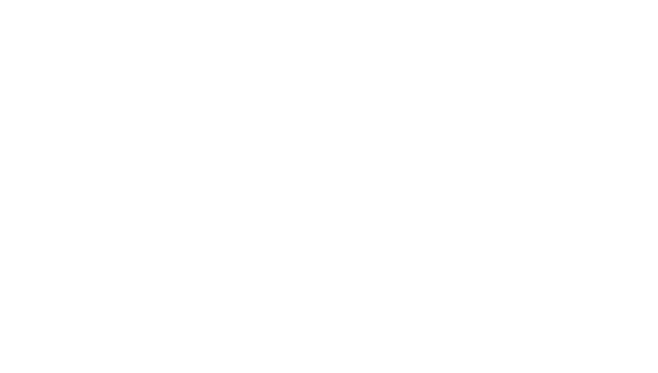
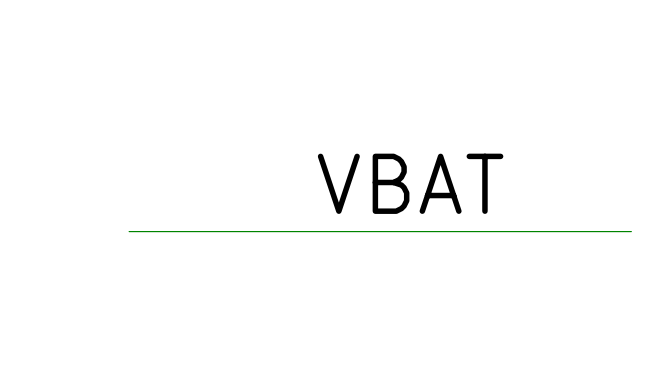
label: none -> VBAT (410, 183)
wire: none -> (129, 231) (631, 231)

